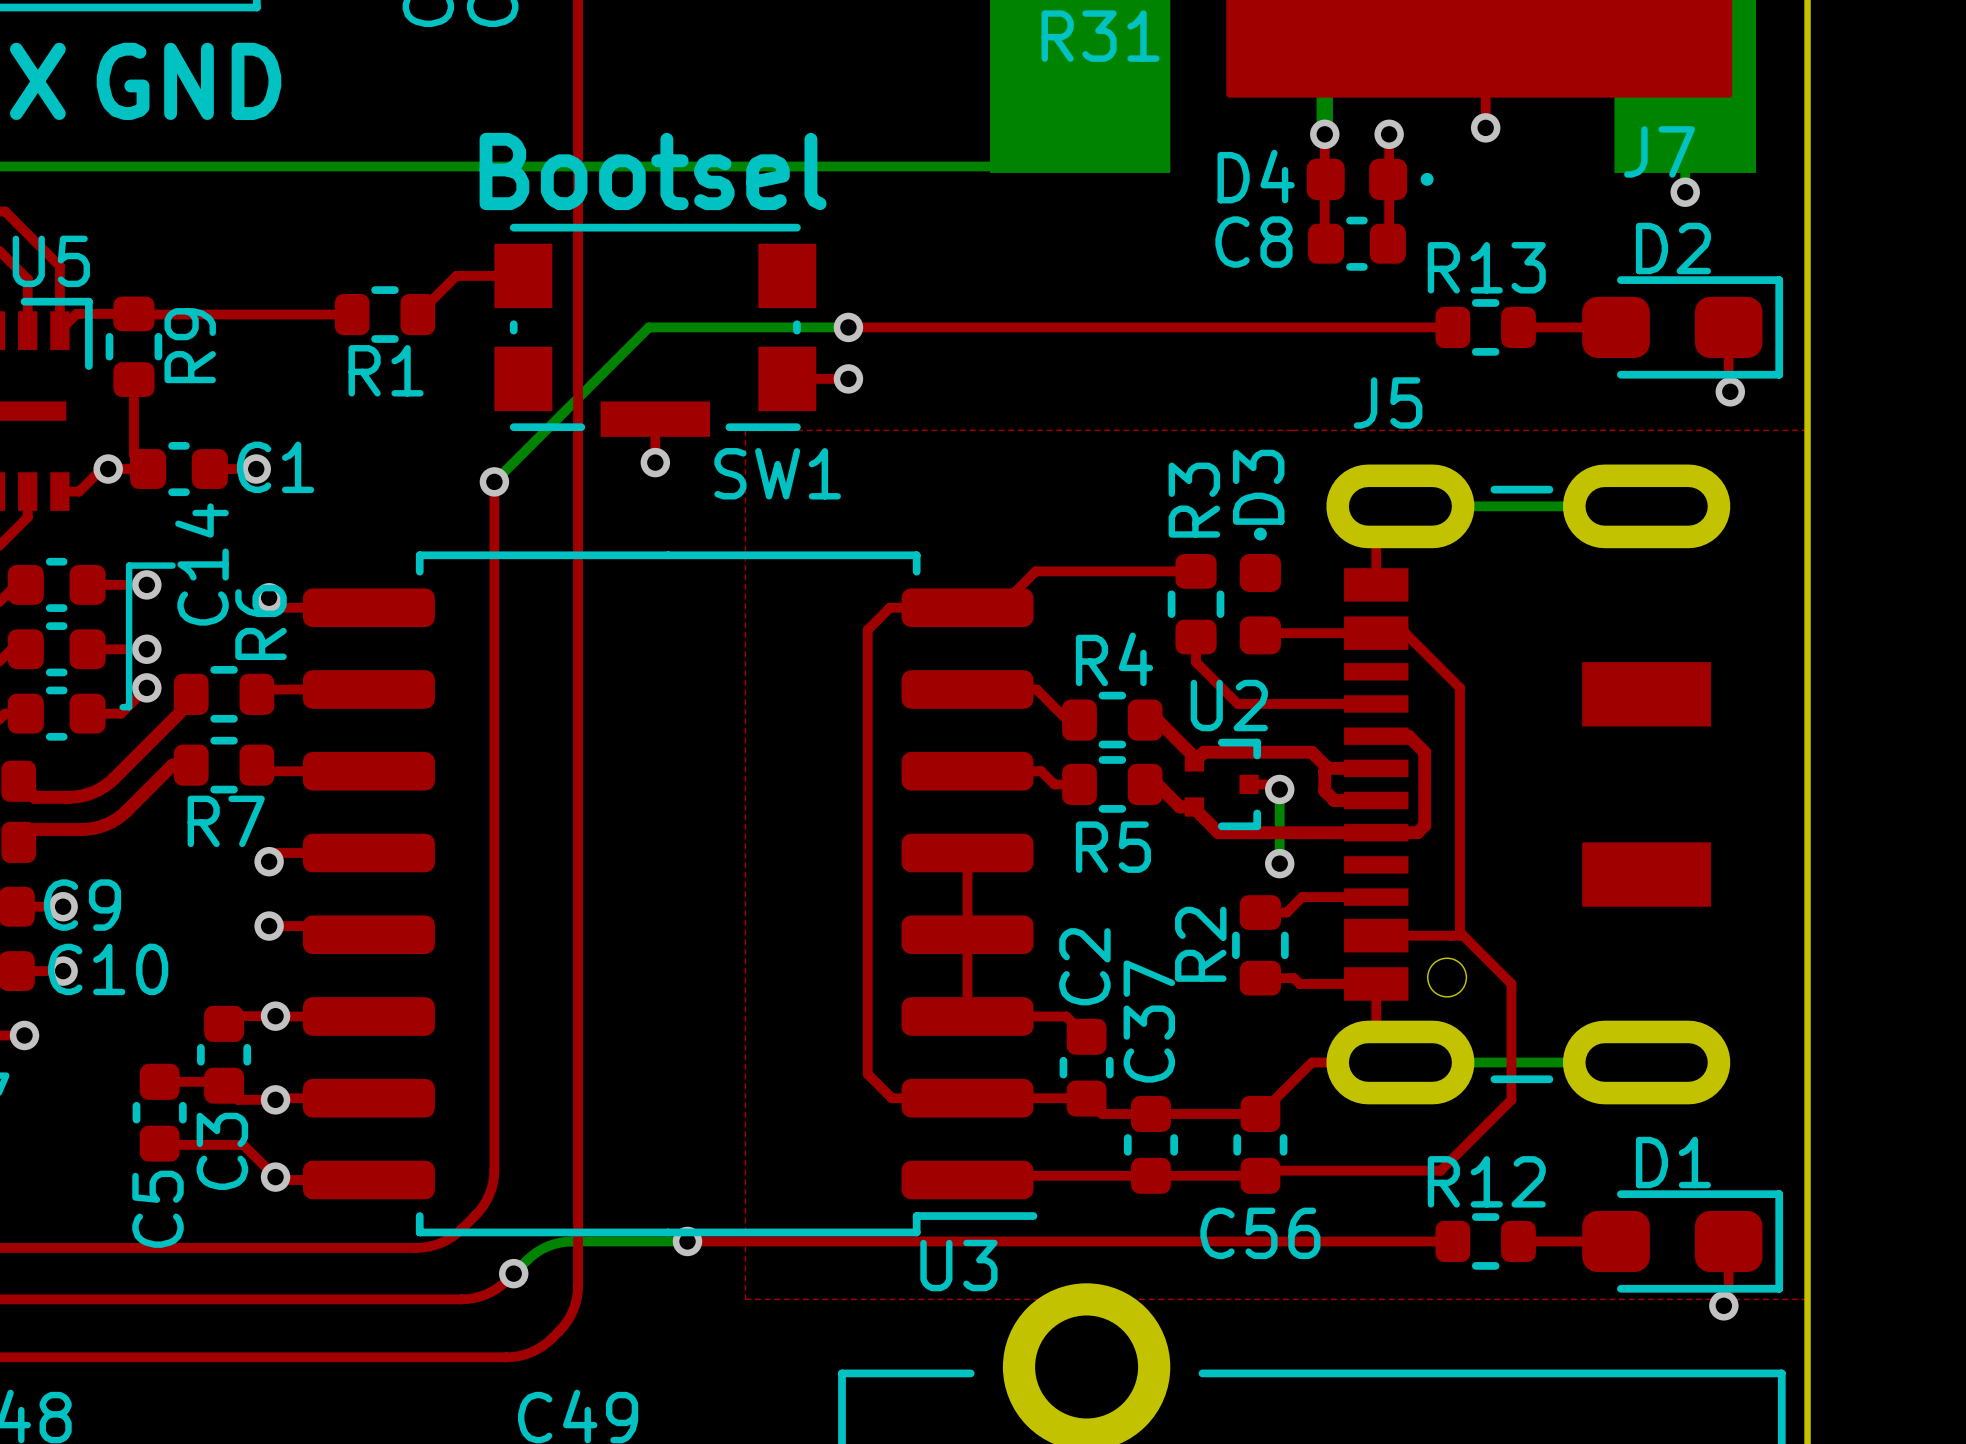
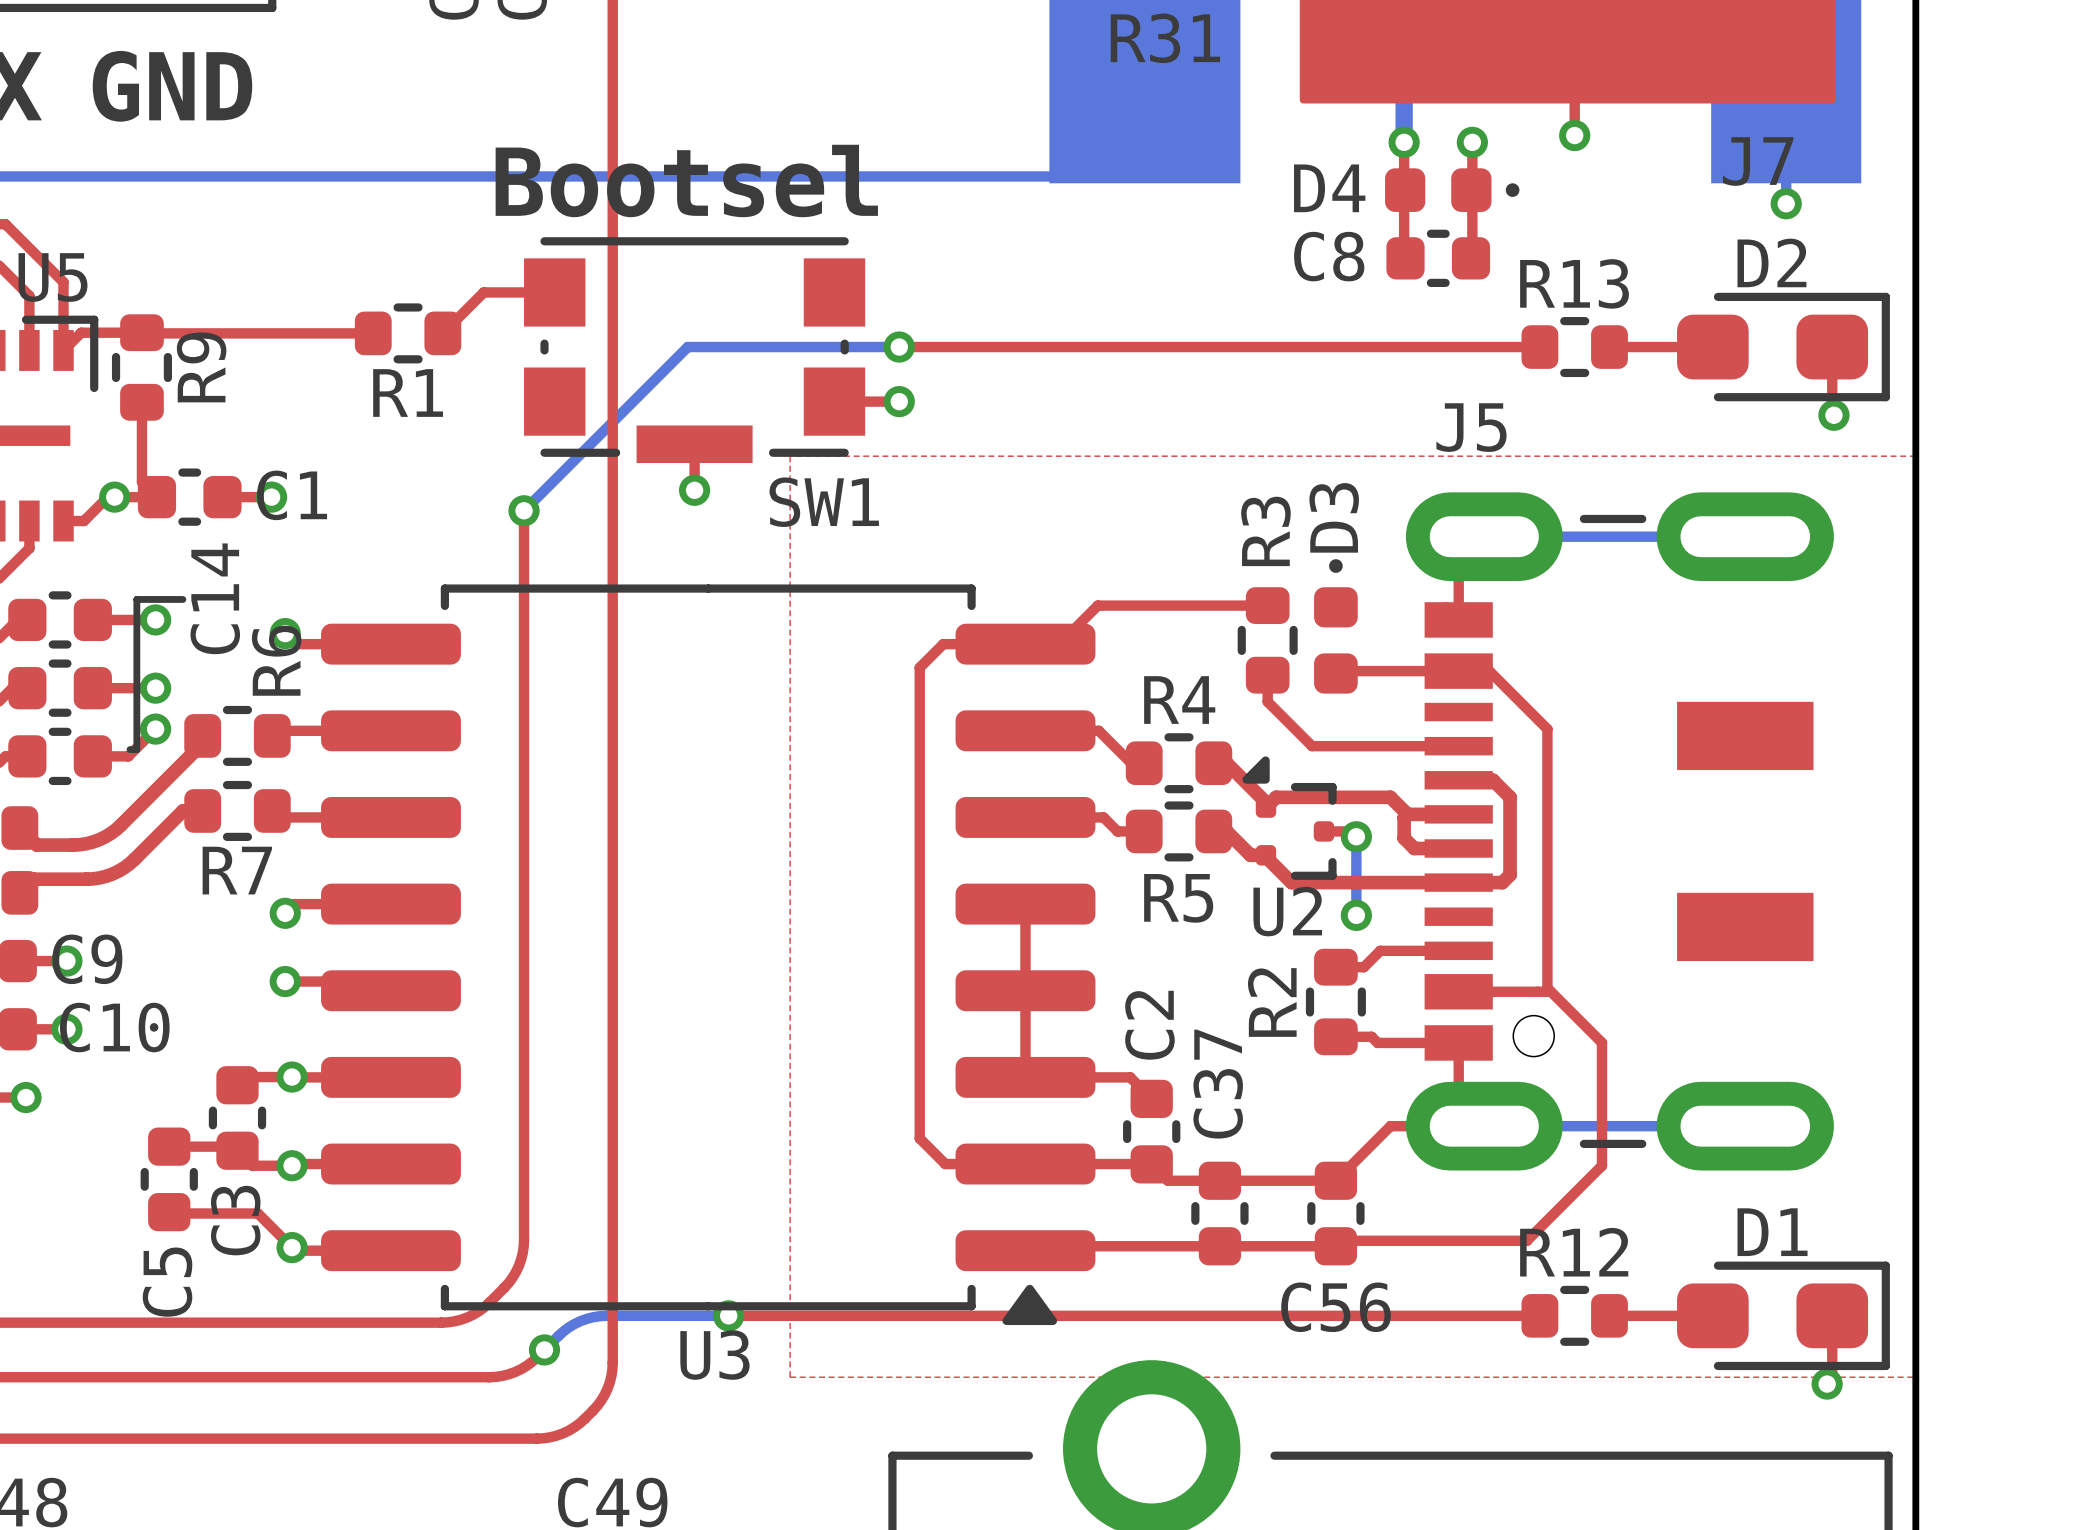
U3 footprint: [302, 551, 1038, 1237] -> [321, 584, 1096, 1326]
U2 name position: U2 (1229, 705) -> U2 (1287, 911)
U2 footprint: [1184, 738, 1262, 831] -> [1242, 756, 1337, 880]
U3 name position: U3 (958, 1265) -> U3 (714, 1355)

